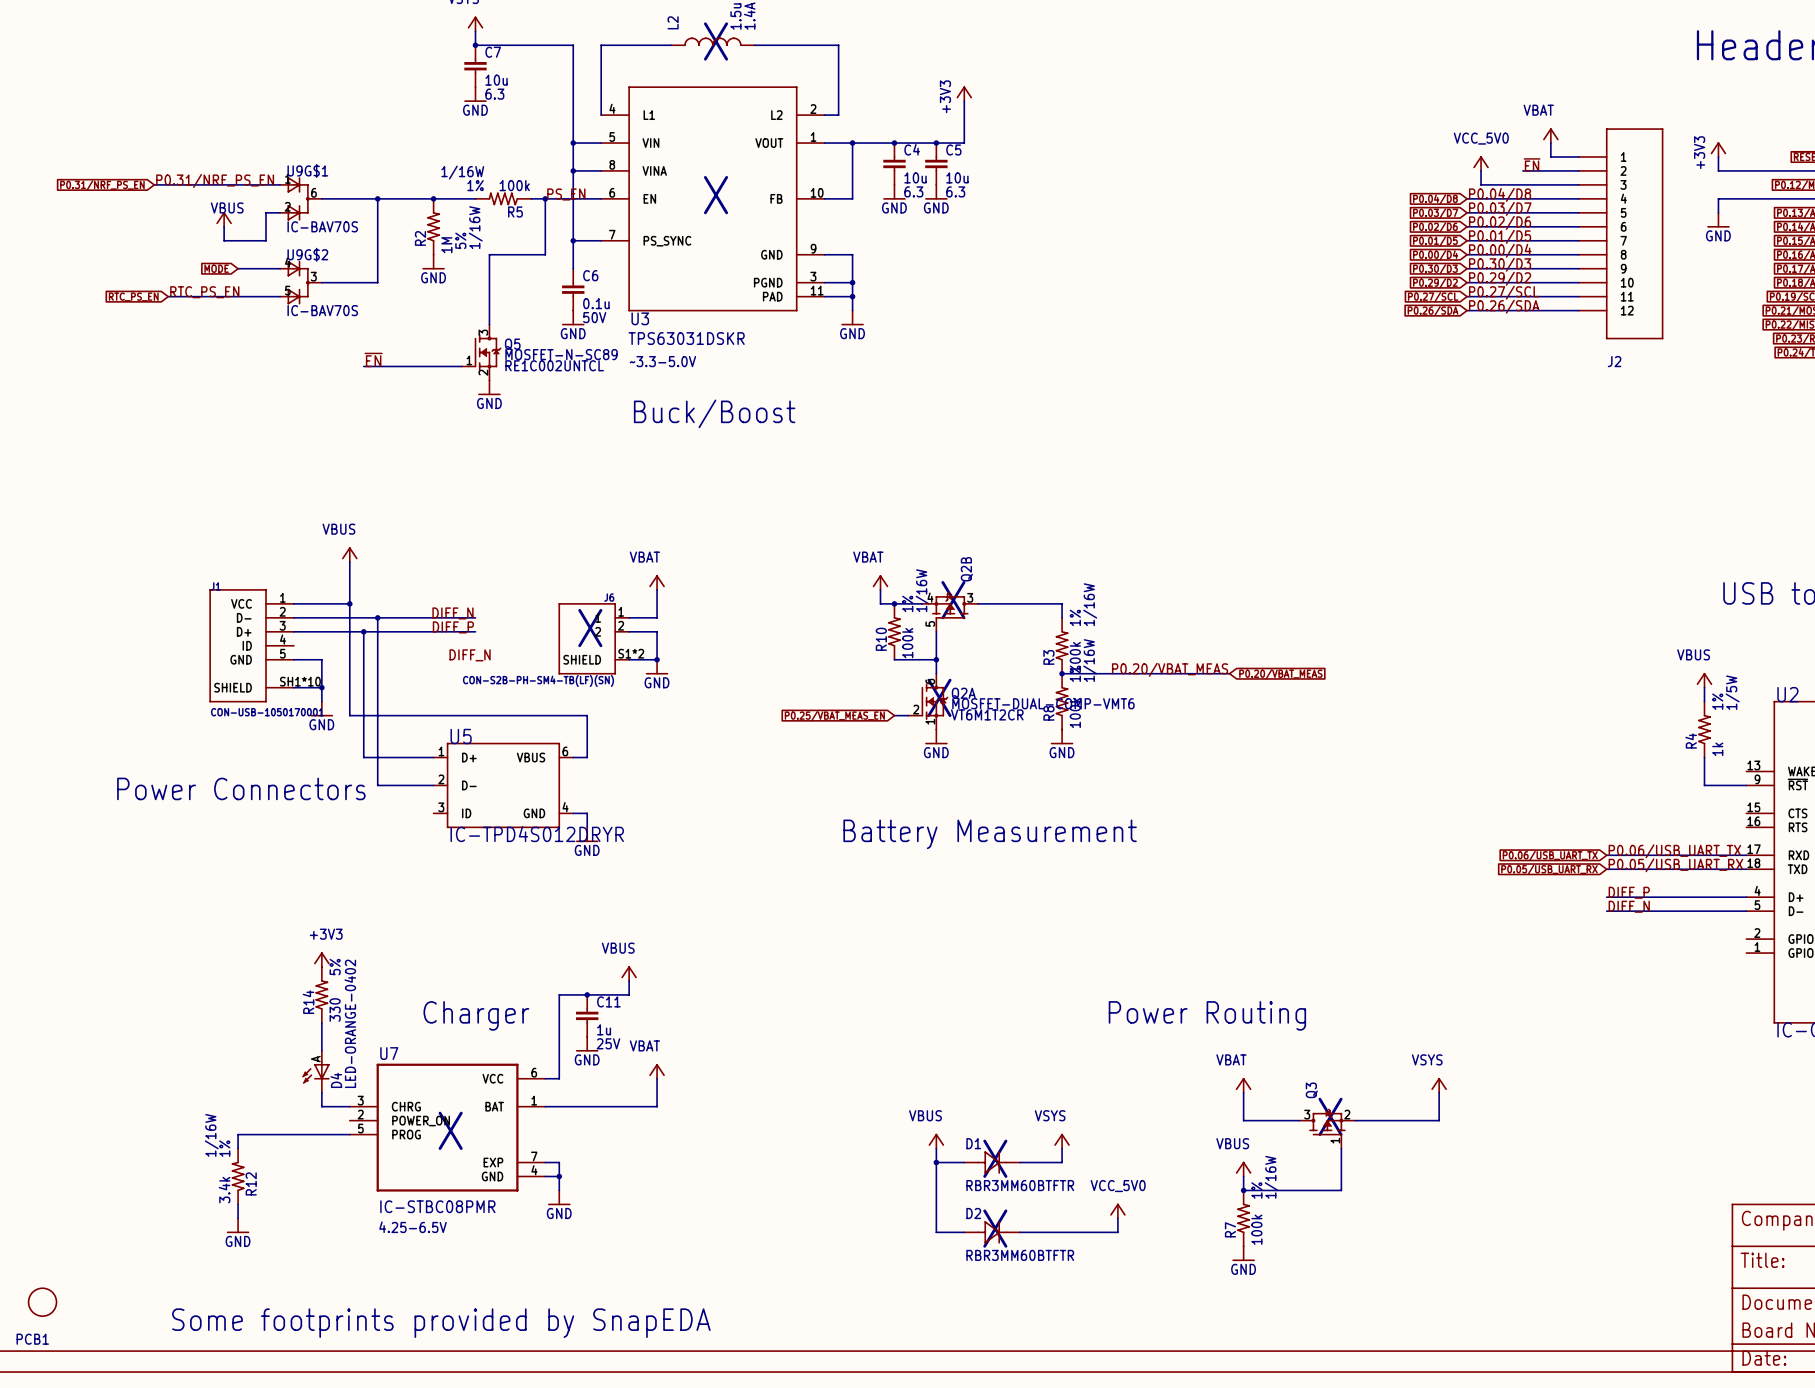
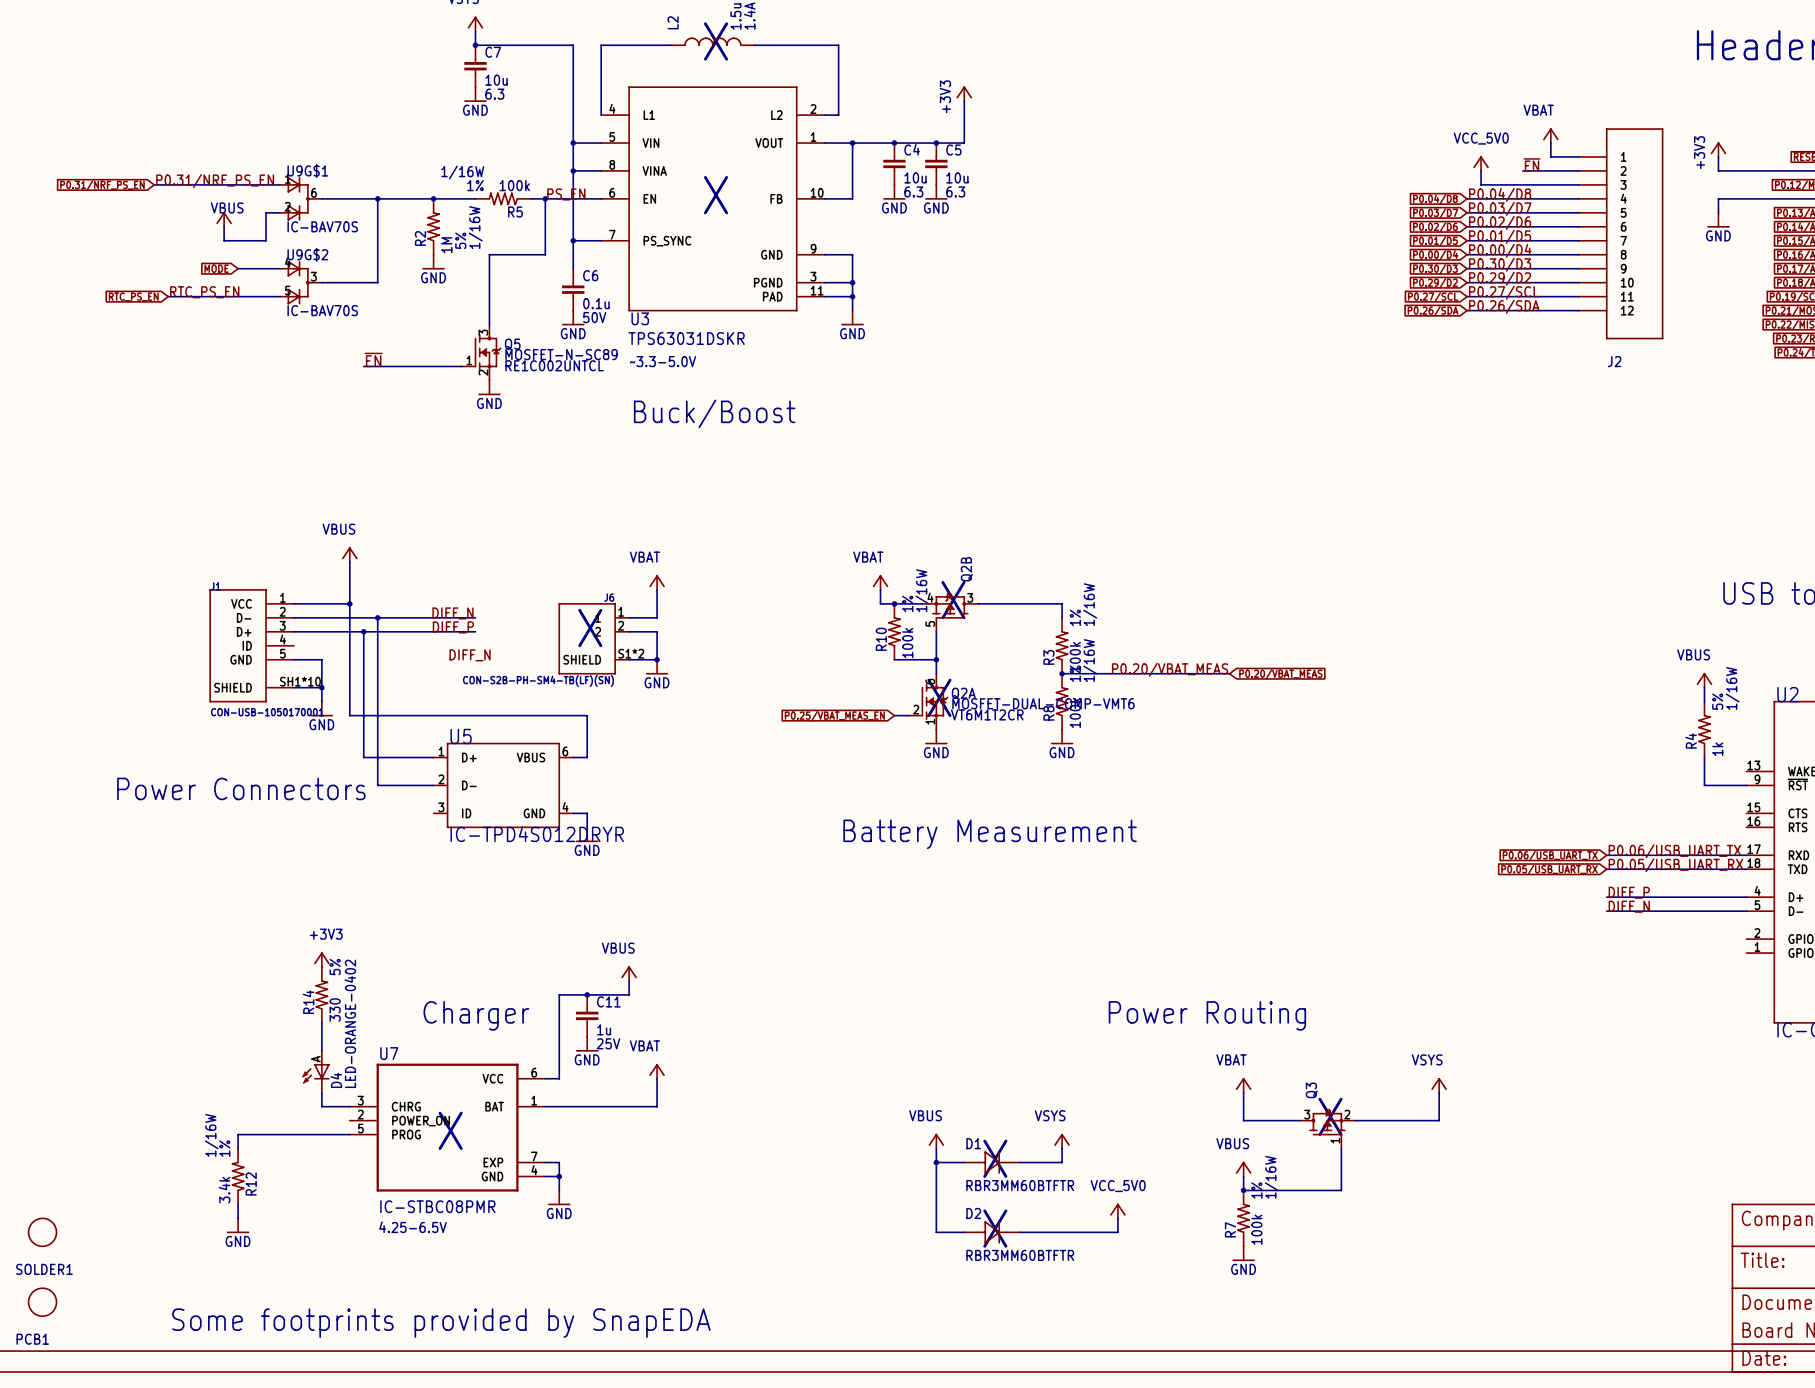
R4 text: 1/5W (1732, 692) -> 1/16W (1732, 688)
R4 text: 1% (1717, 701) -> 5% (1717, 701)
SOLDER1: none -> (42, 1232)

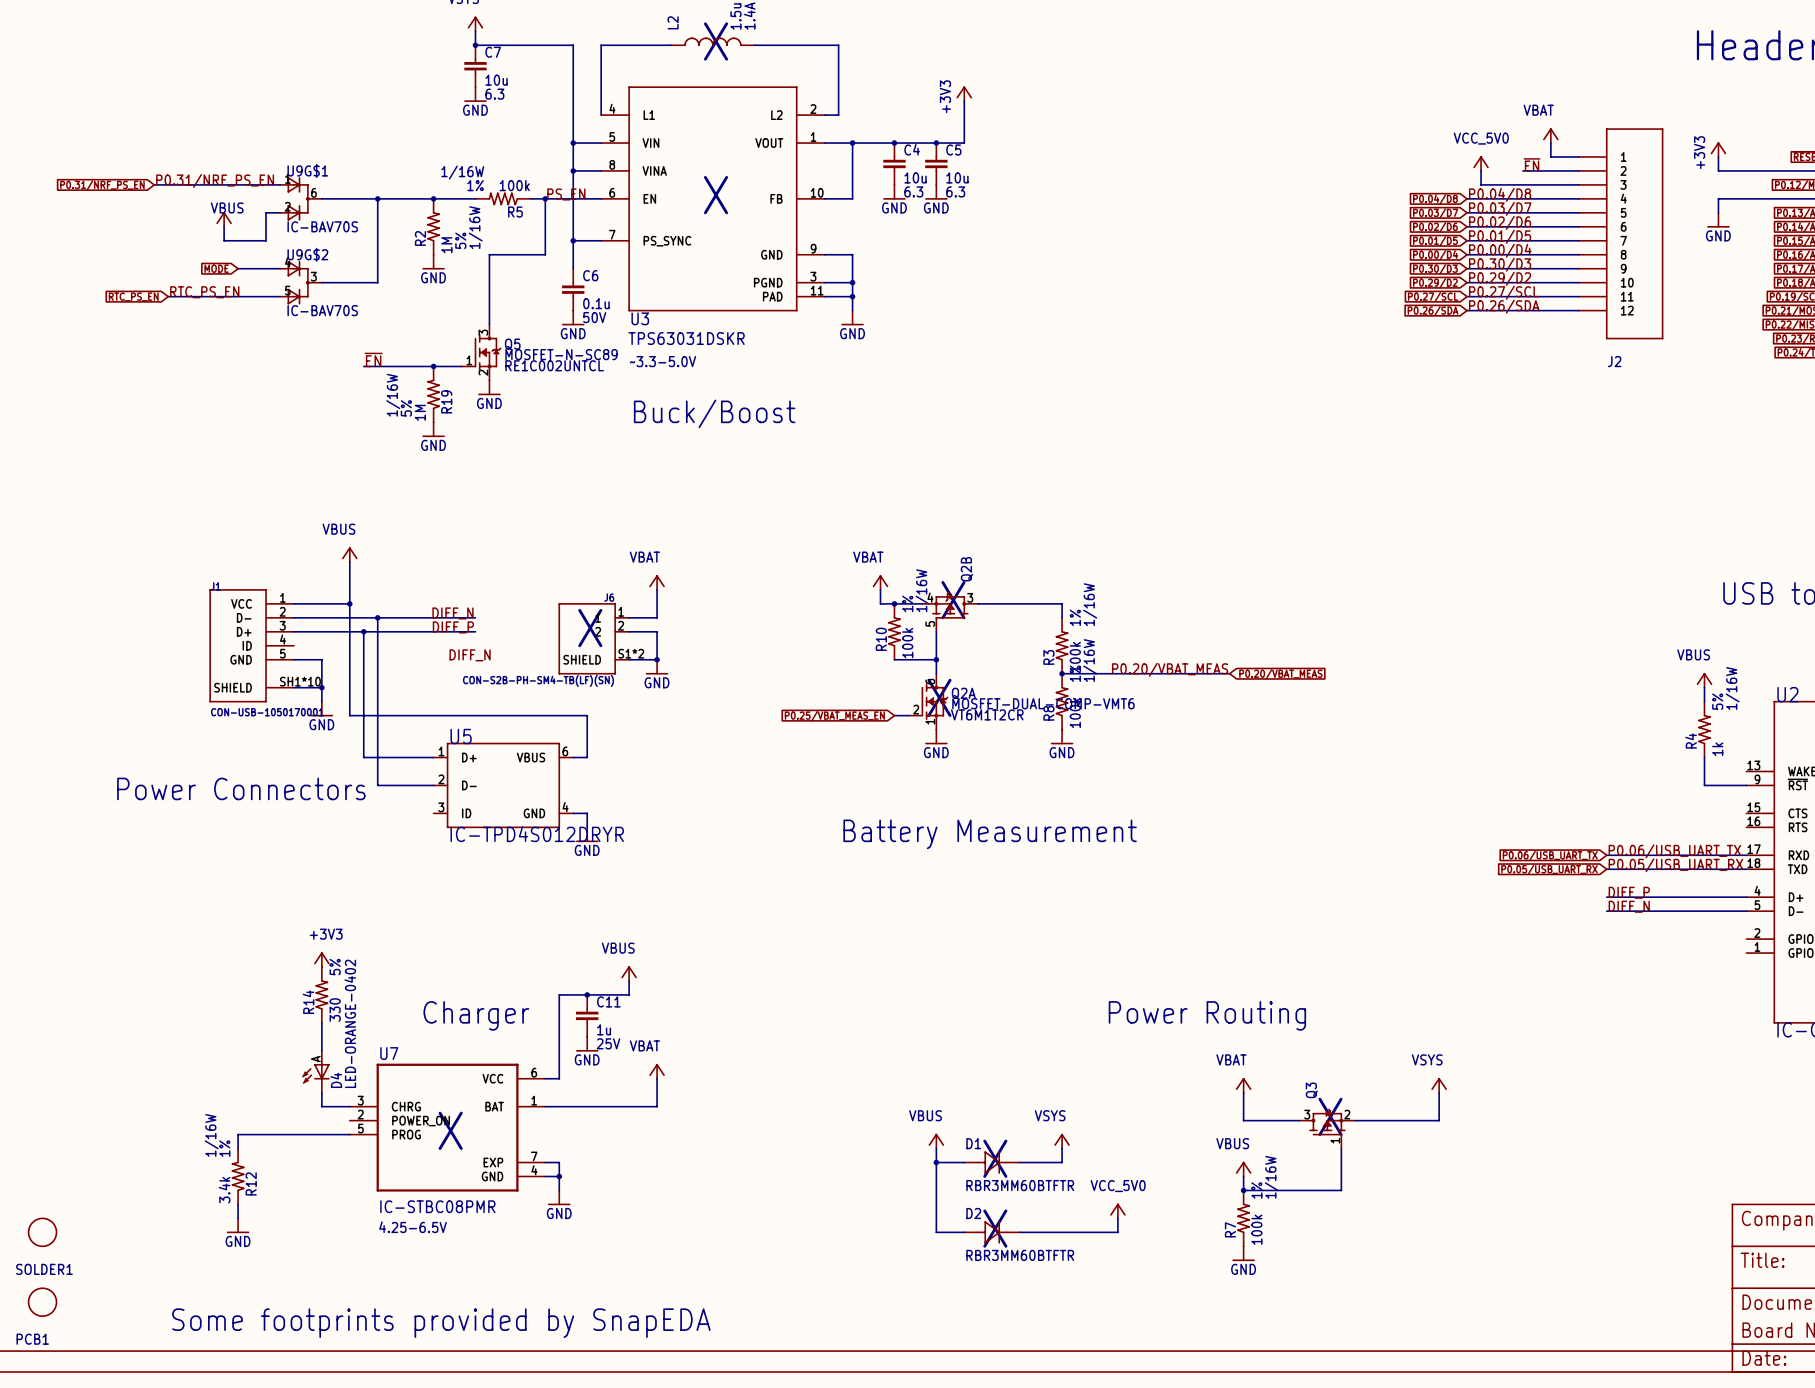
junction: none -> (433, 366)
R19: none -> 1M (433, 394)
power symbol: none -> GND (433, 429)

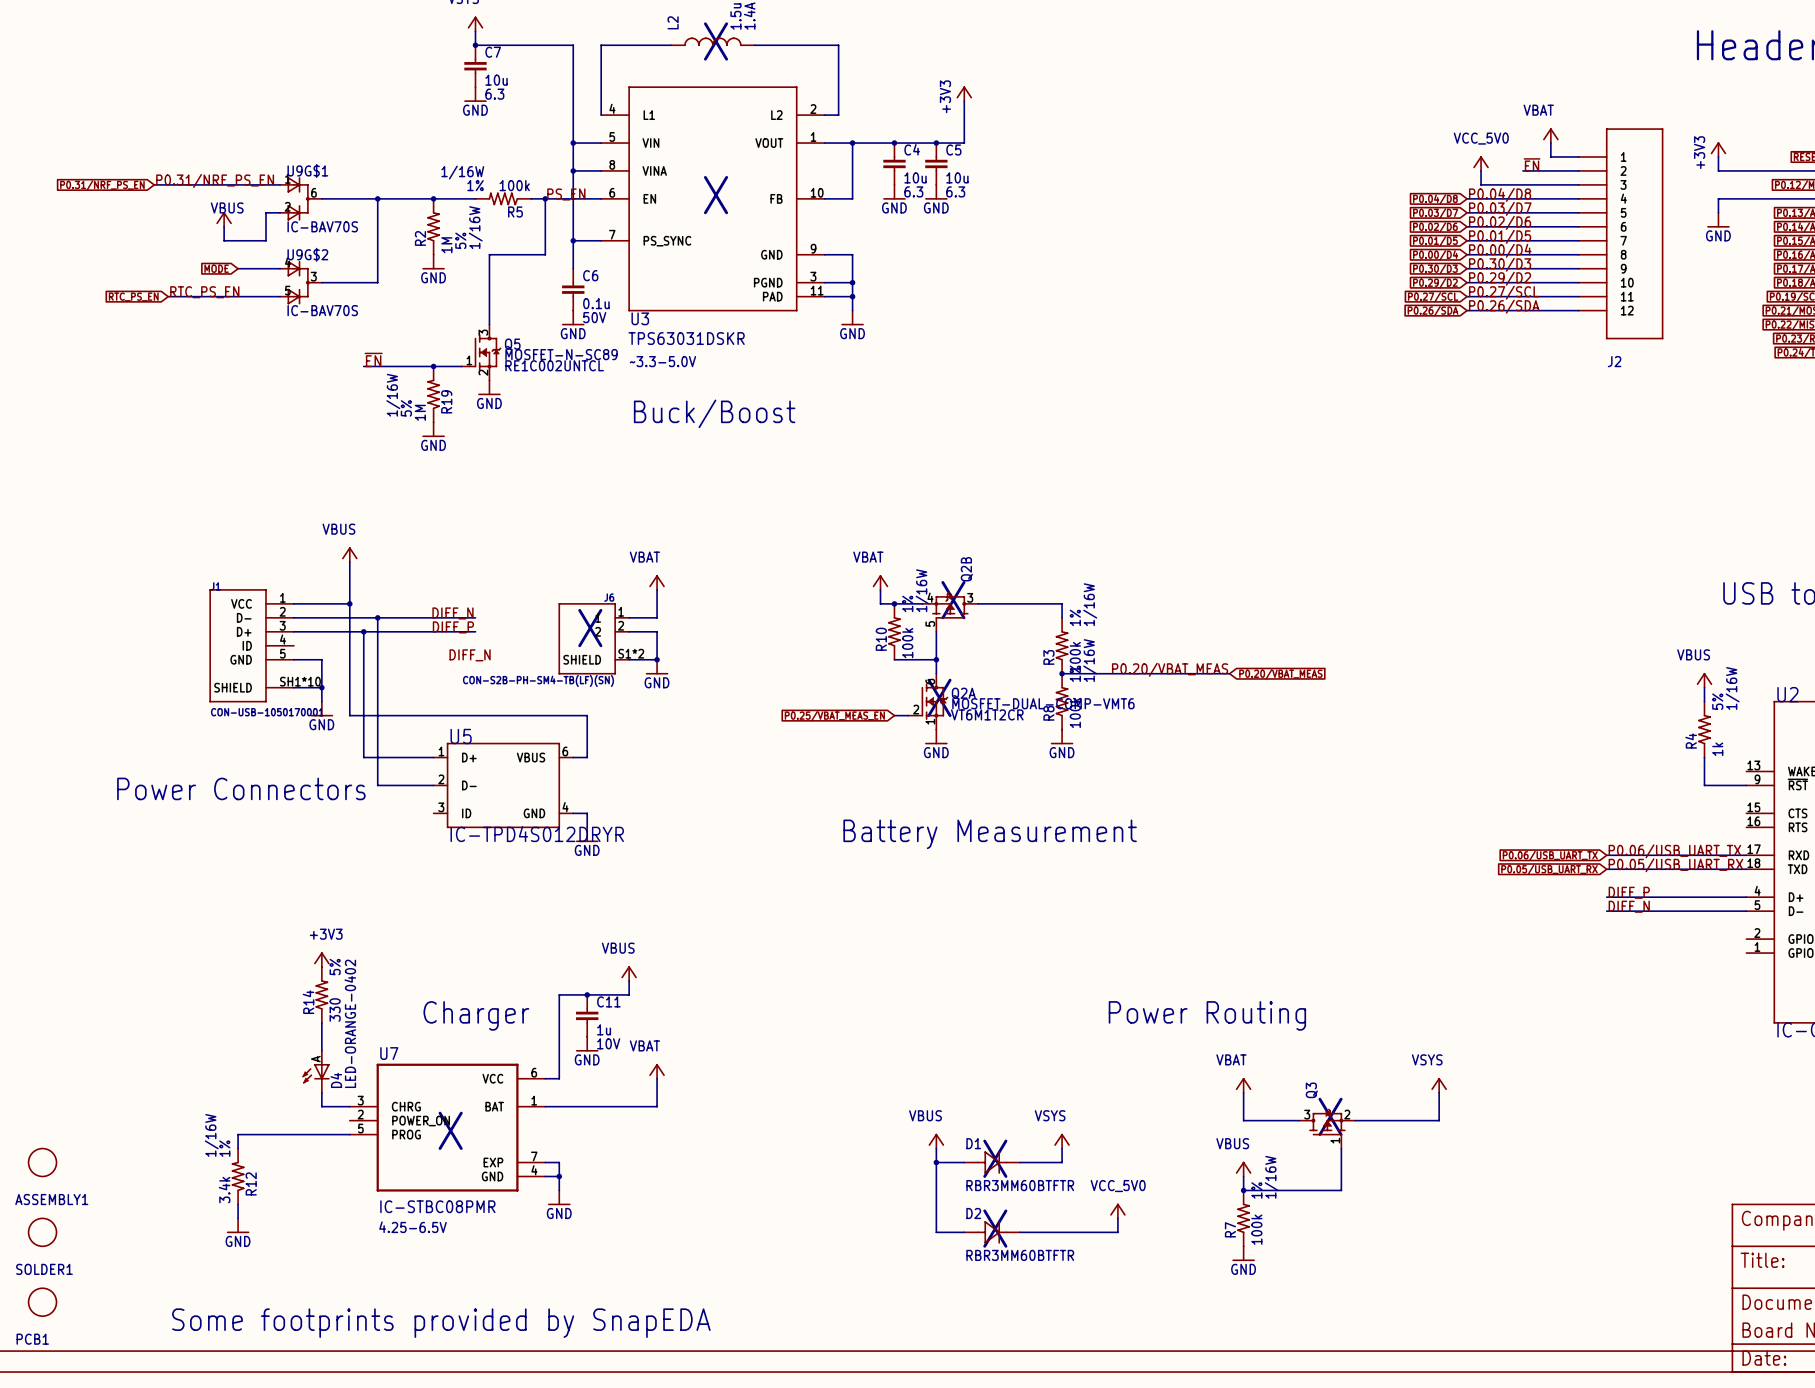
C11 text: 25V (608, 1043) -> 10V (608, 1043)
ASSEMBLY1: none -> (42, 1162)

